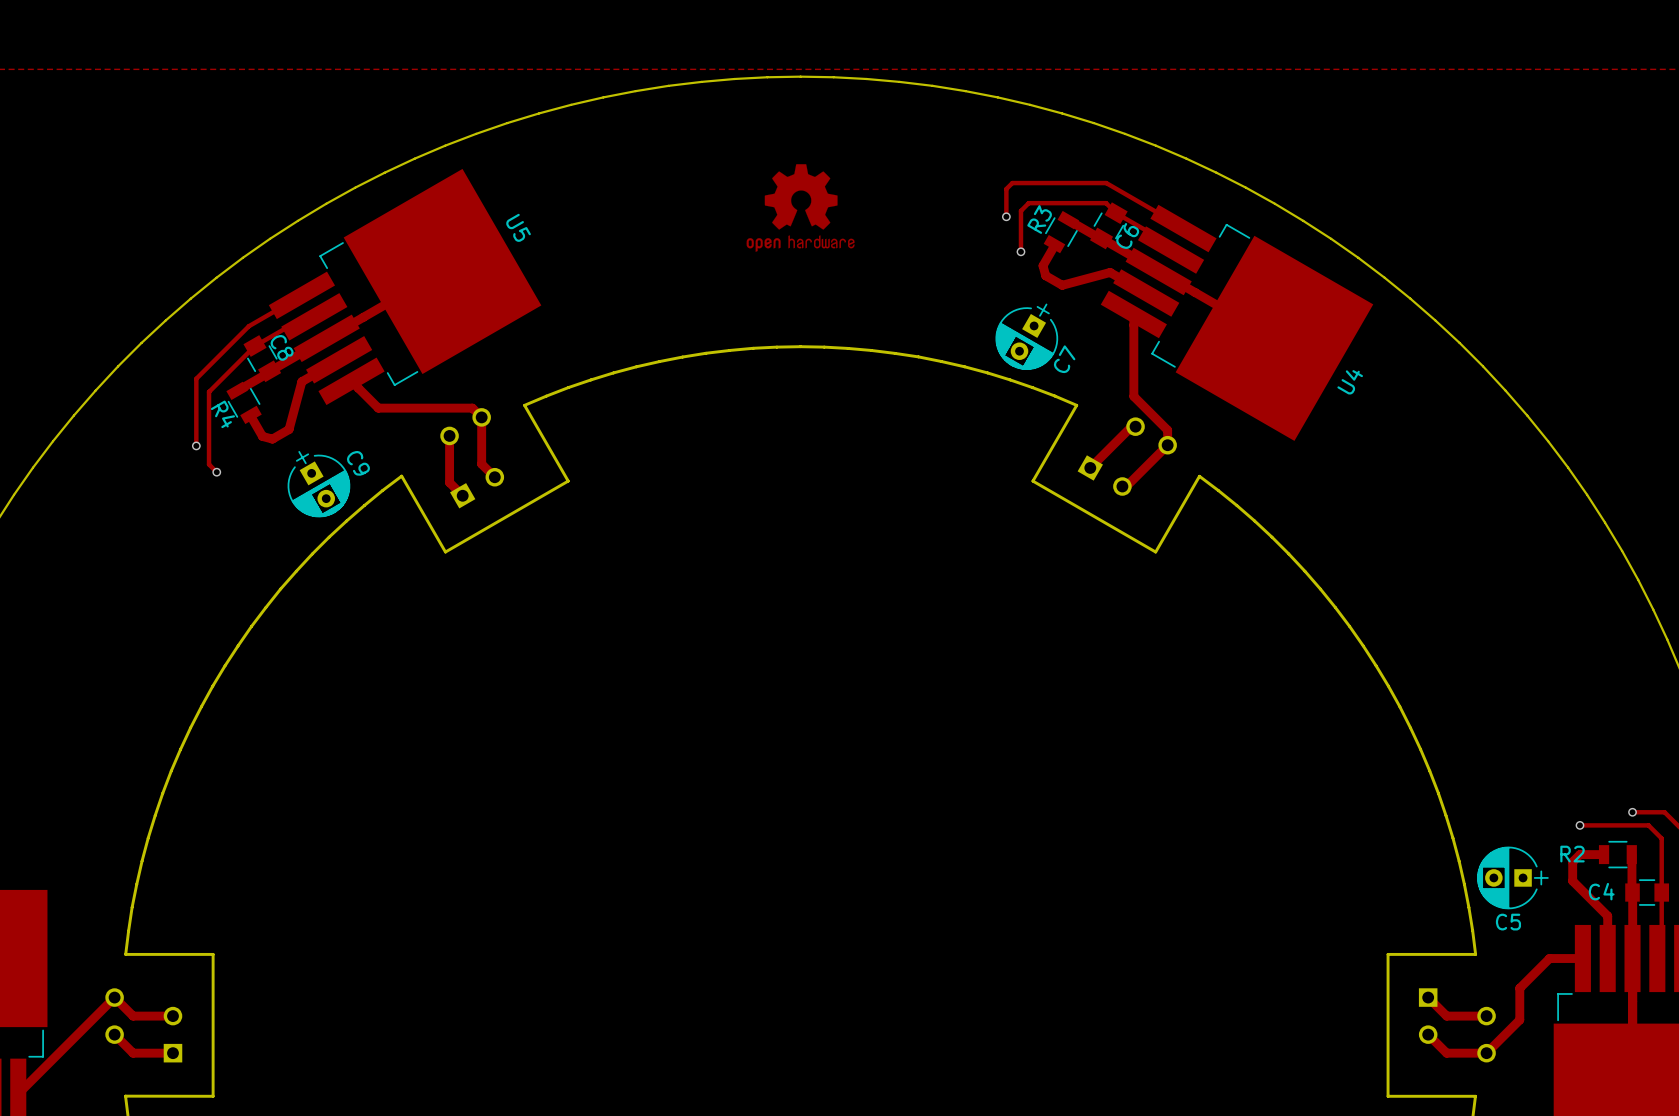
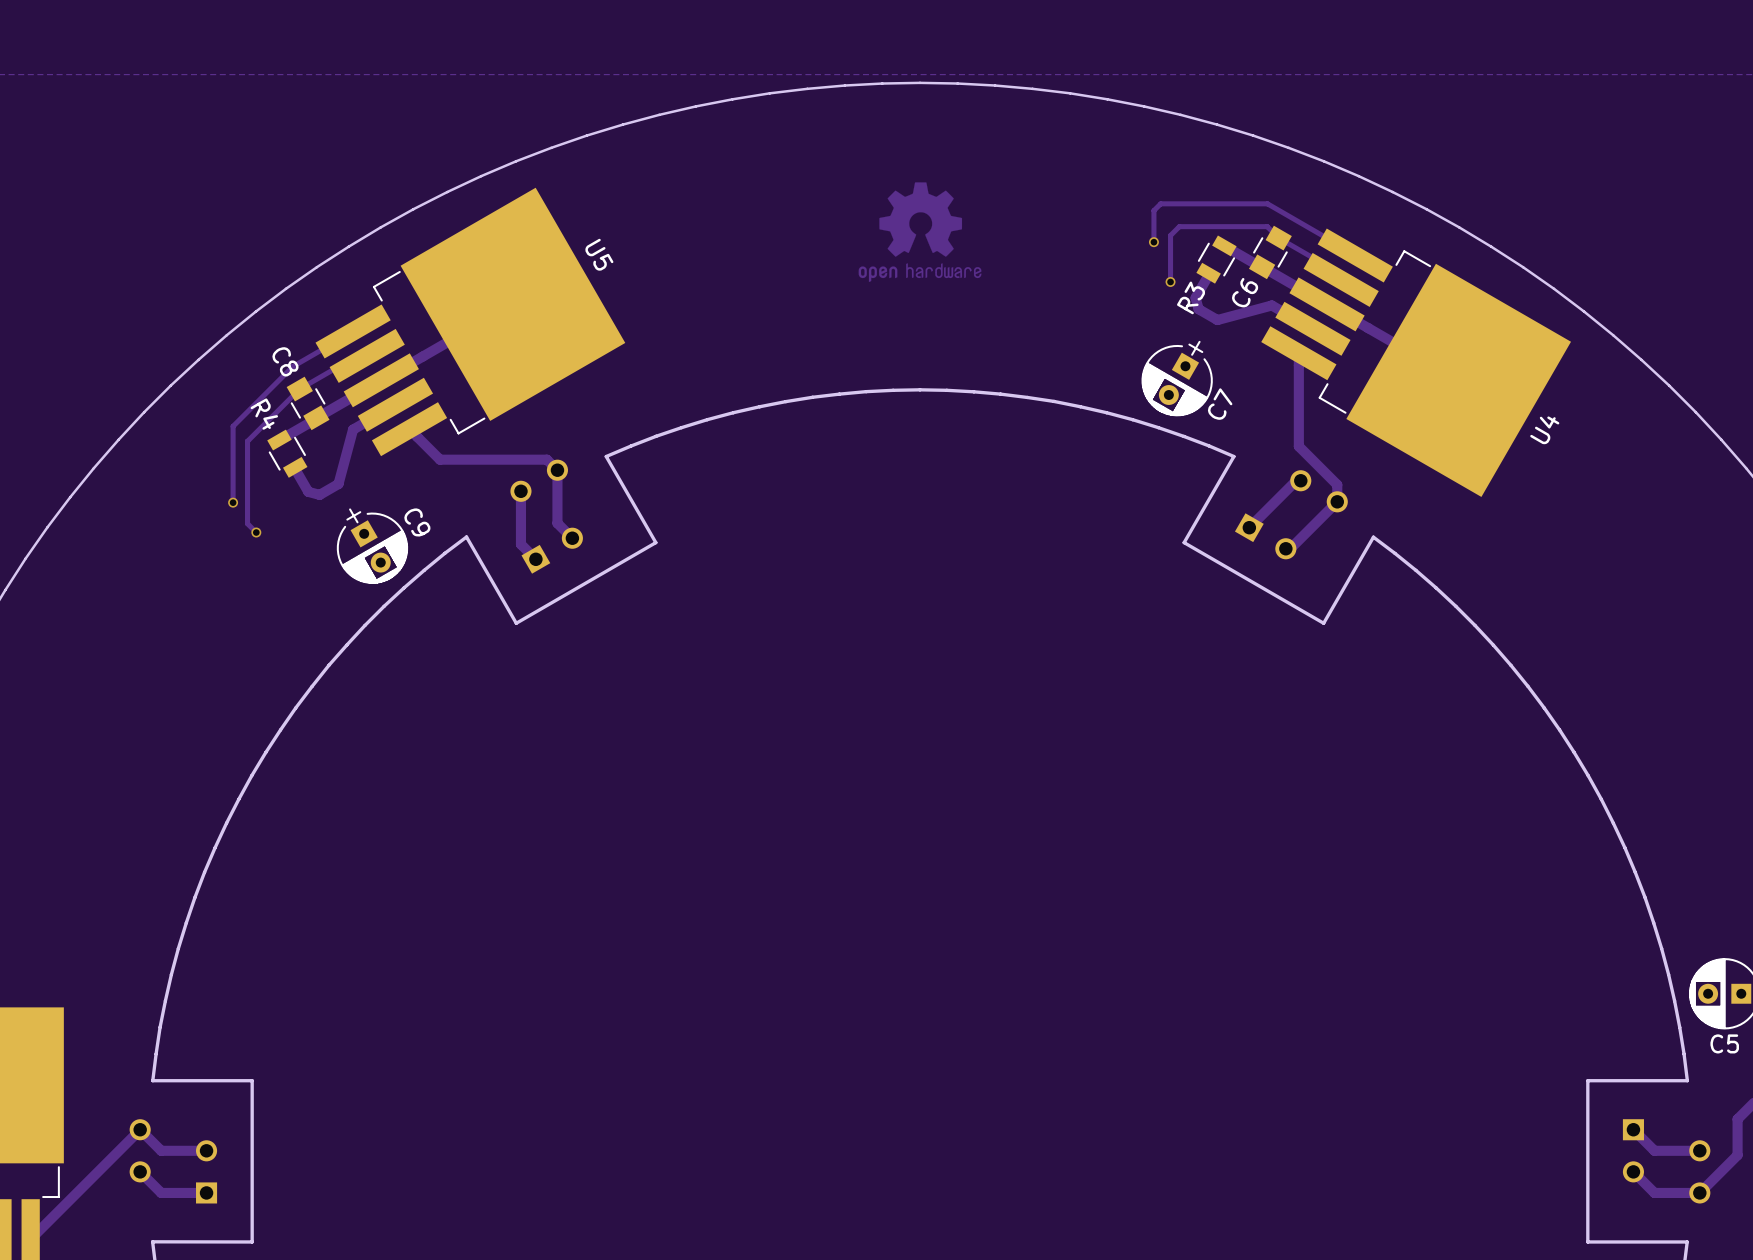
R3 name position: R3 (1039, 219) -> R3 (1191, 297)
C6 name position: C6 (1127, 235) -> C6 (1245, 292)
C8 name position: C8 (282, 347) -> C8 (285, 361)
R4 name position: R4 (222, 414) -> R4 (264, 414)

